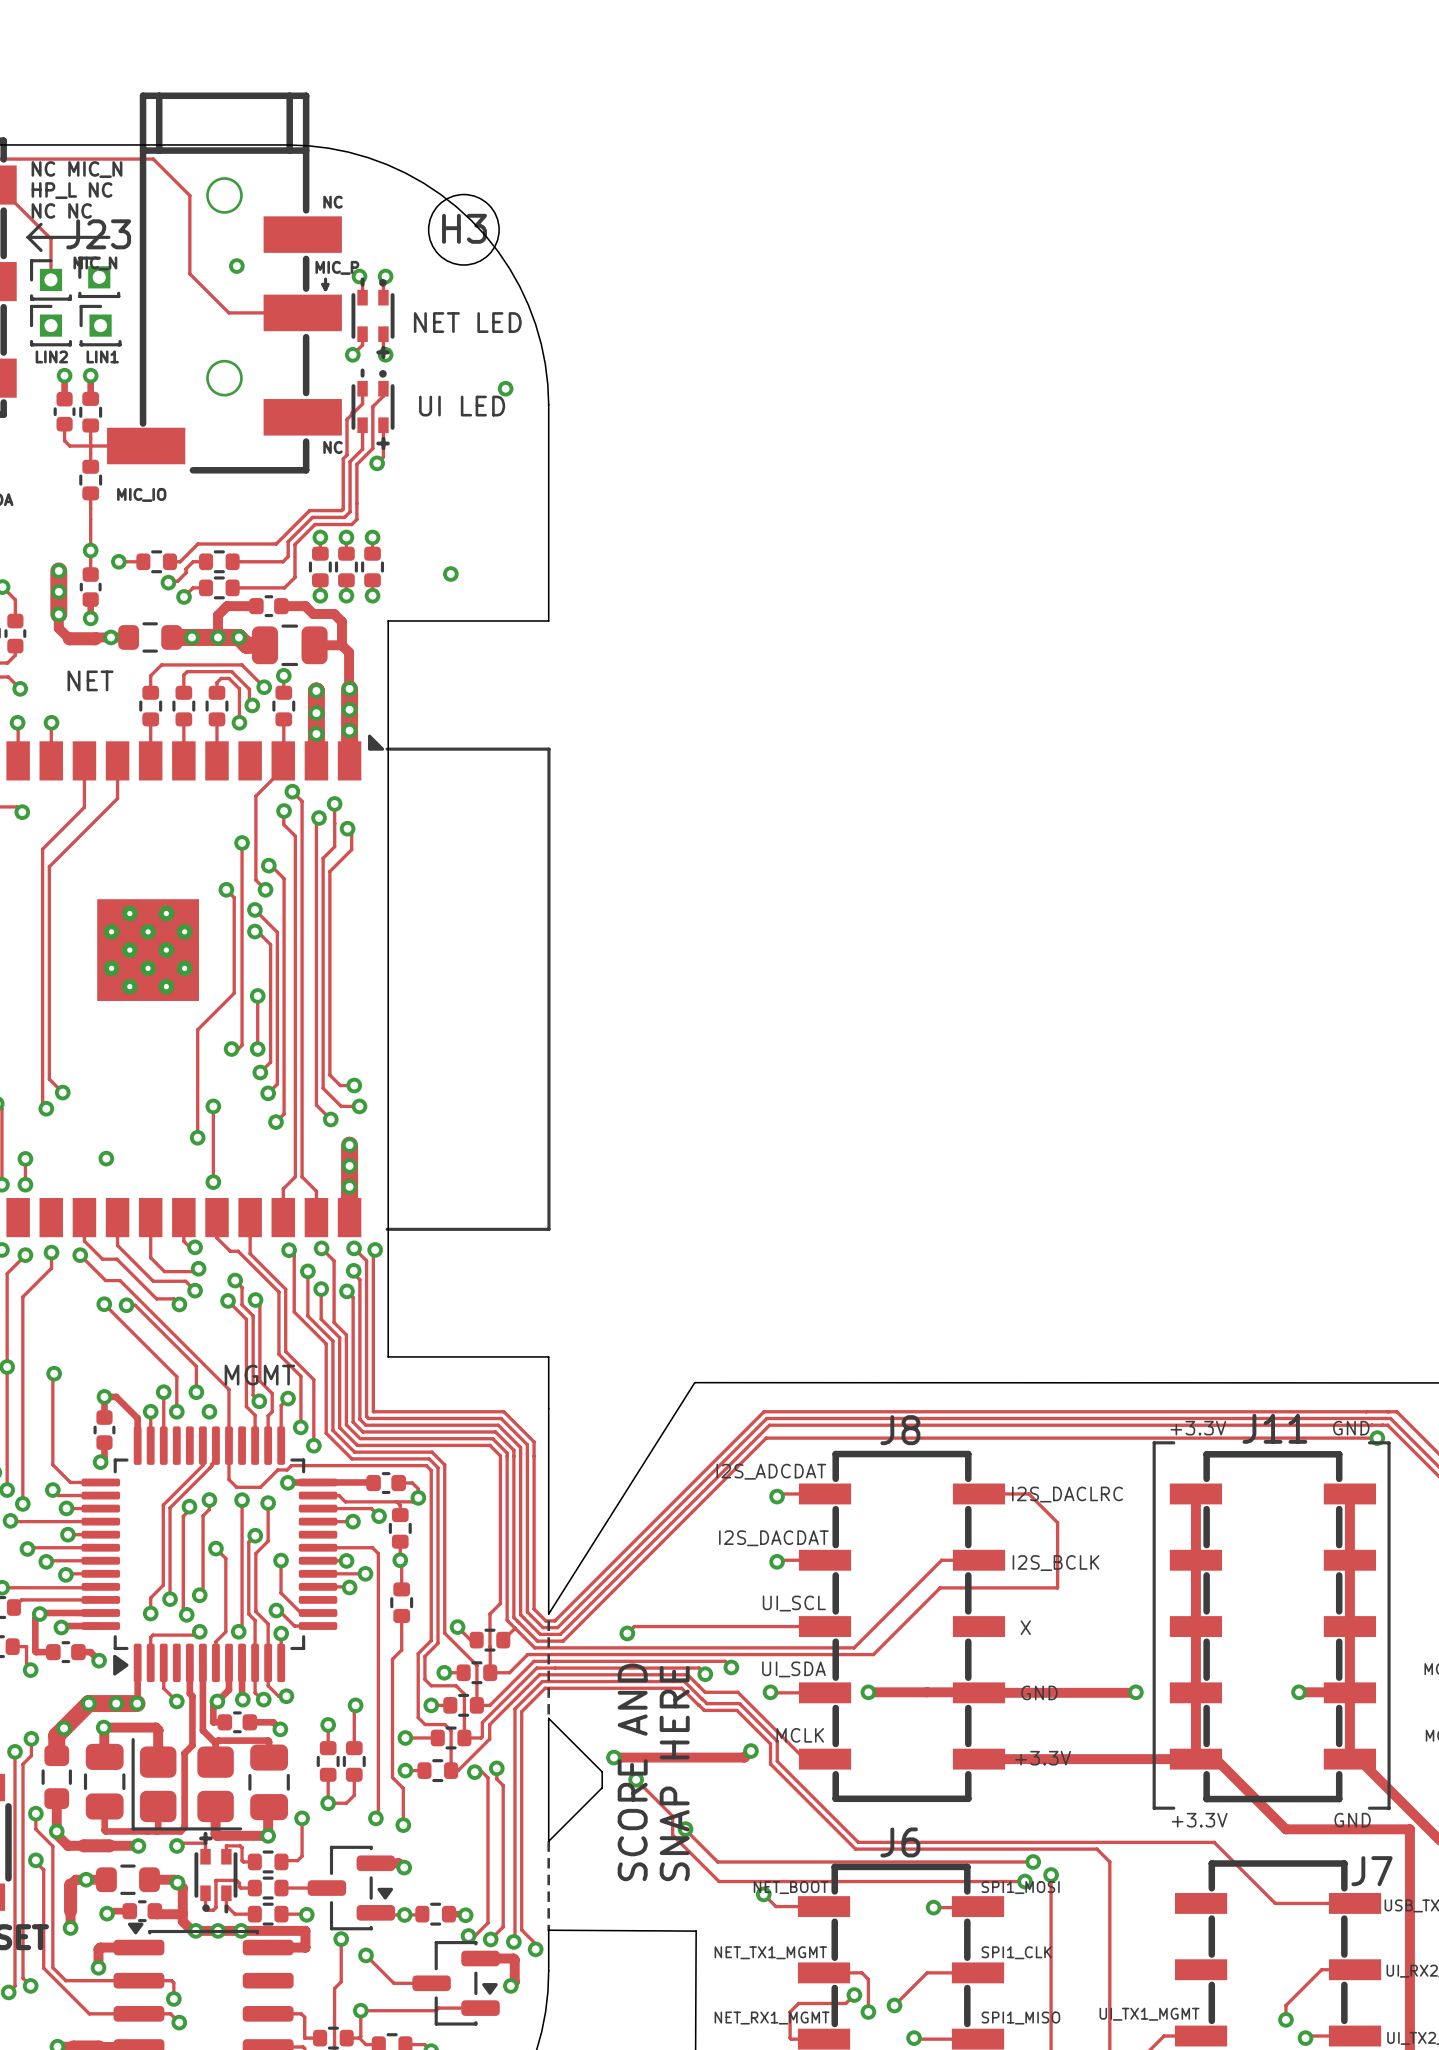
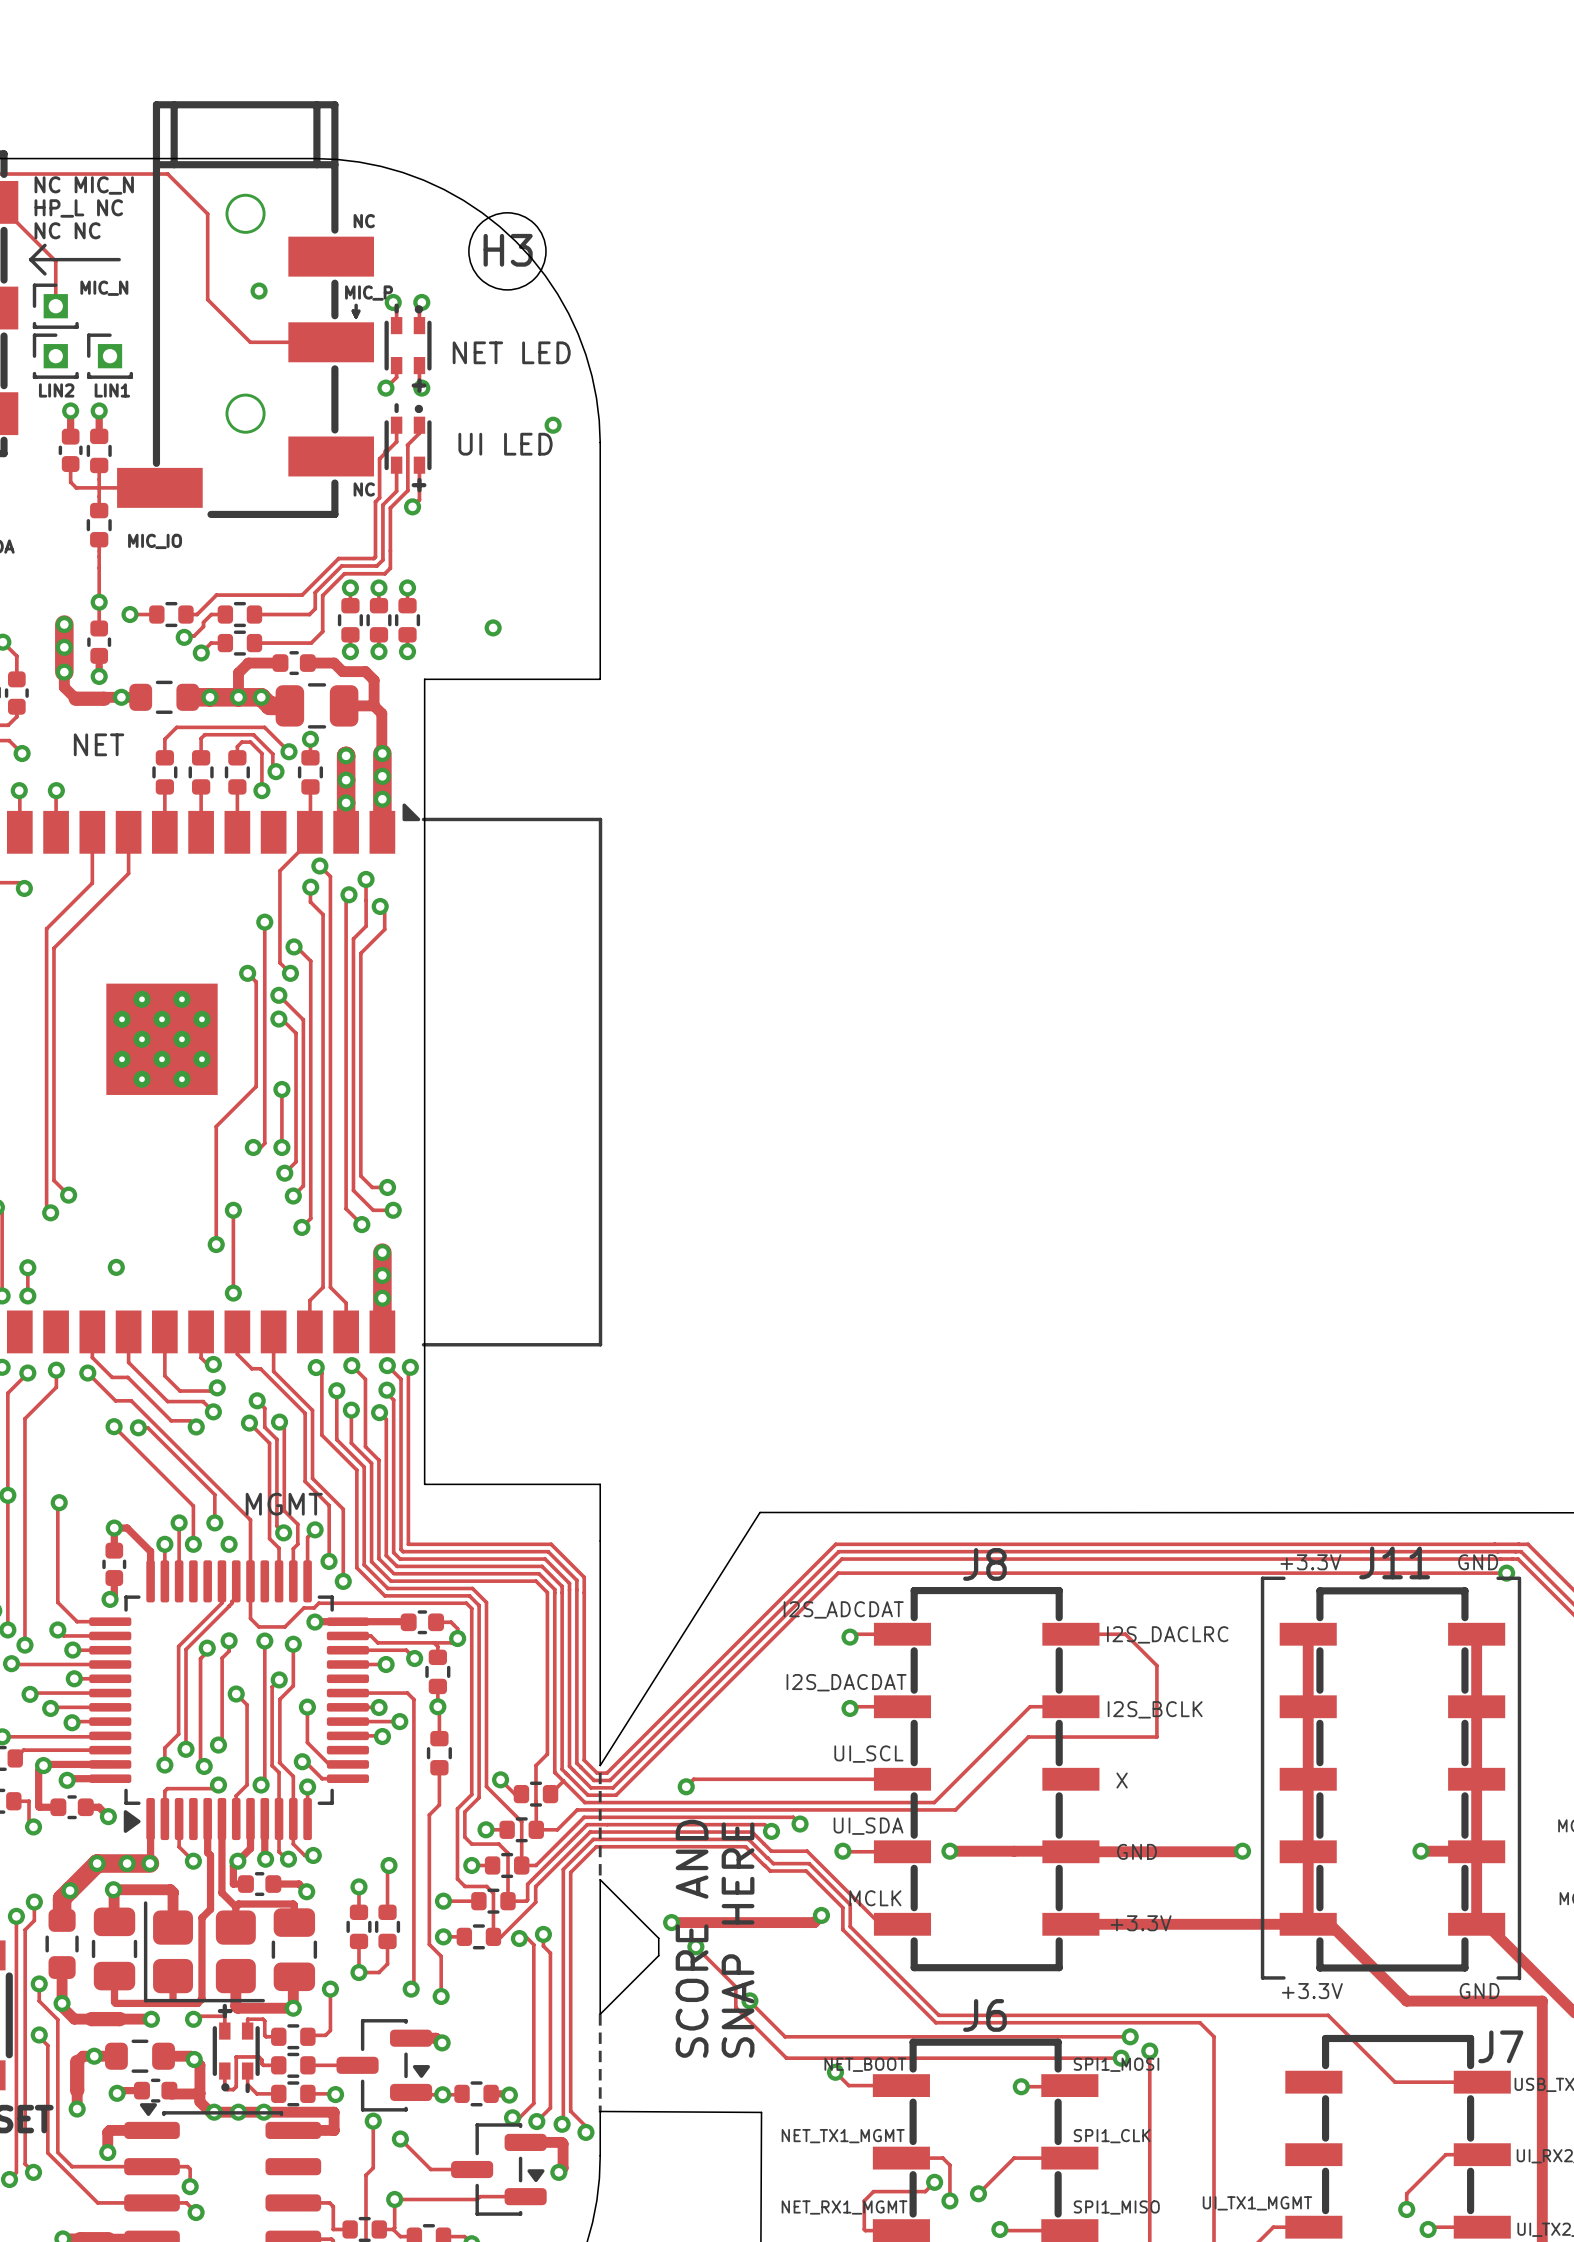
J23: (99, 277) -> none

